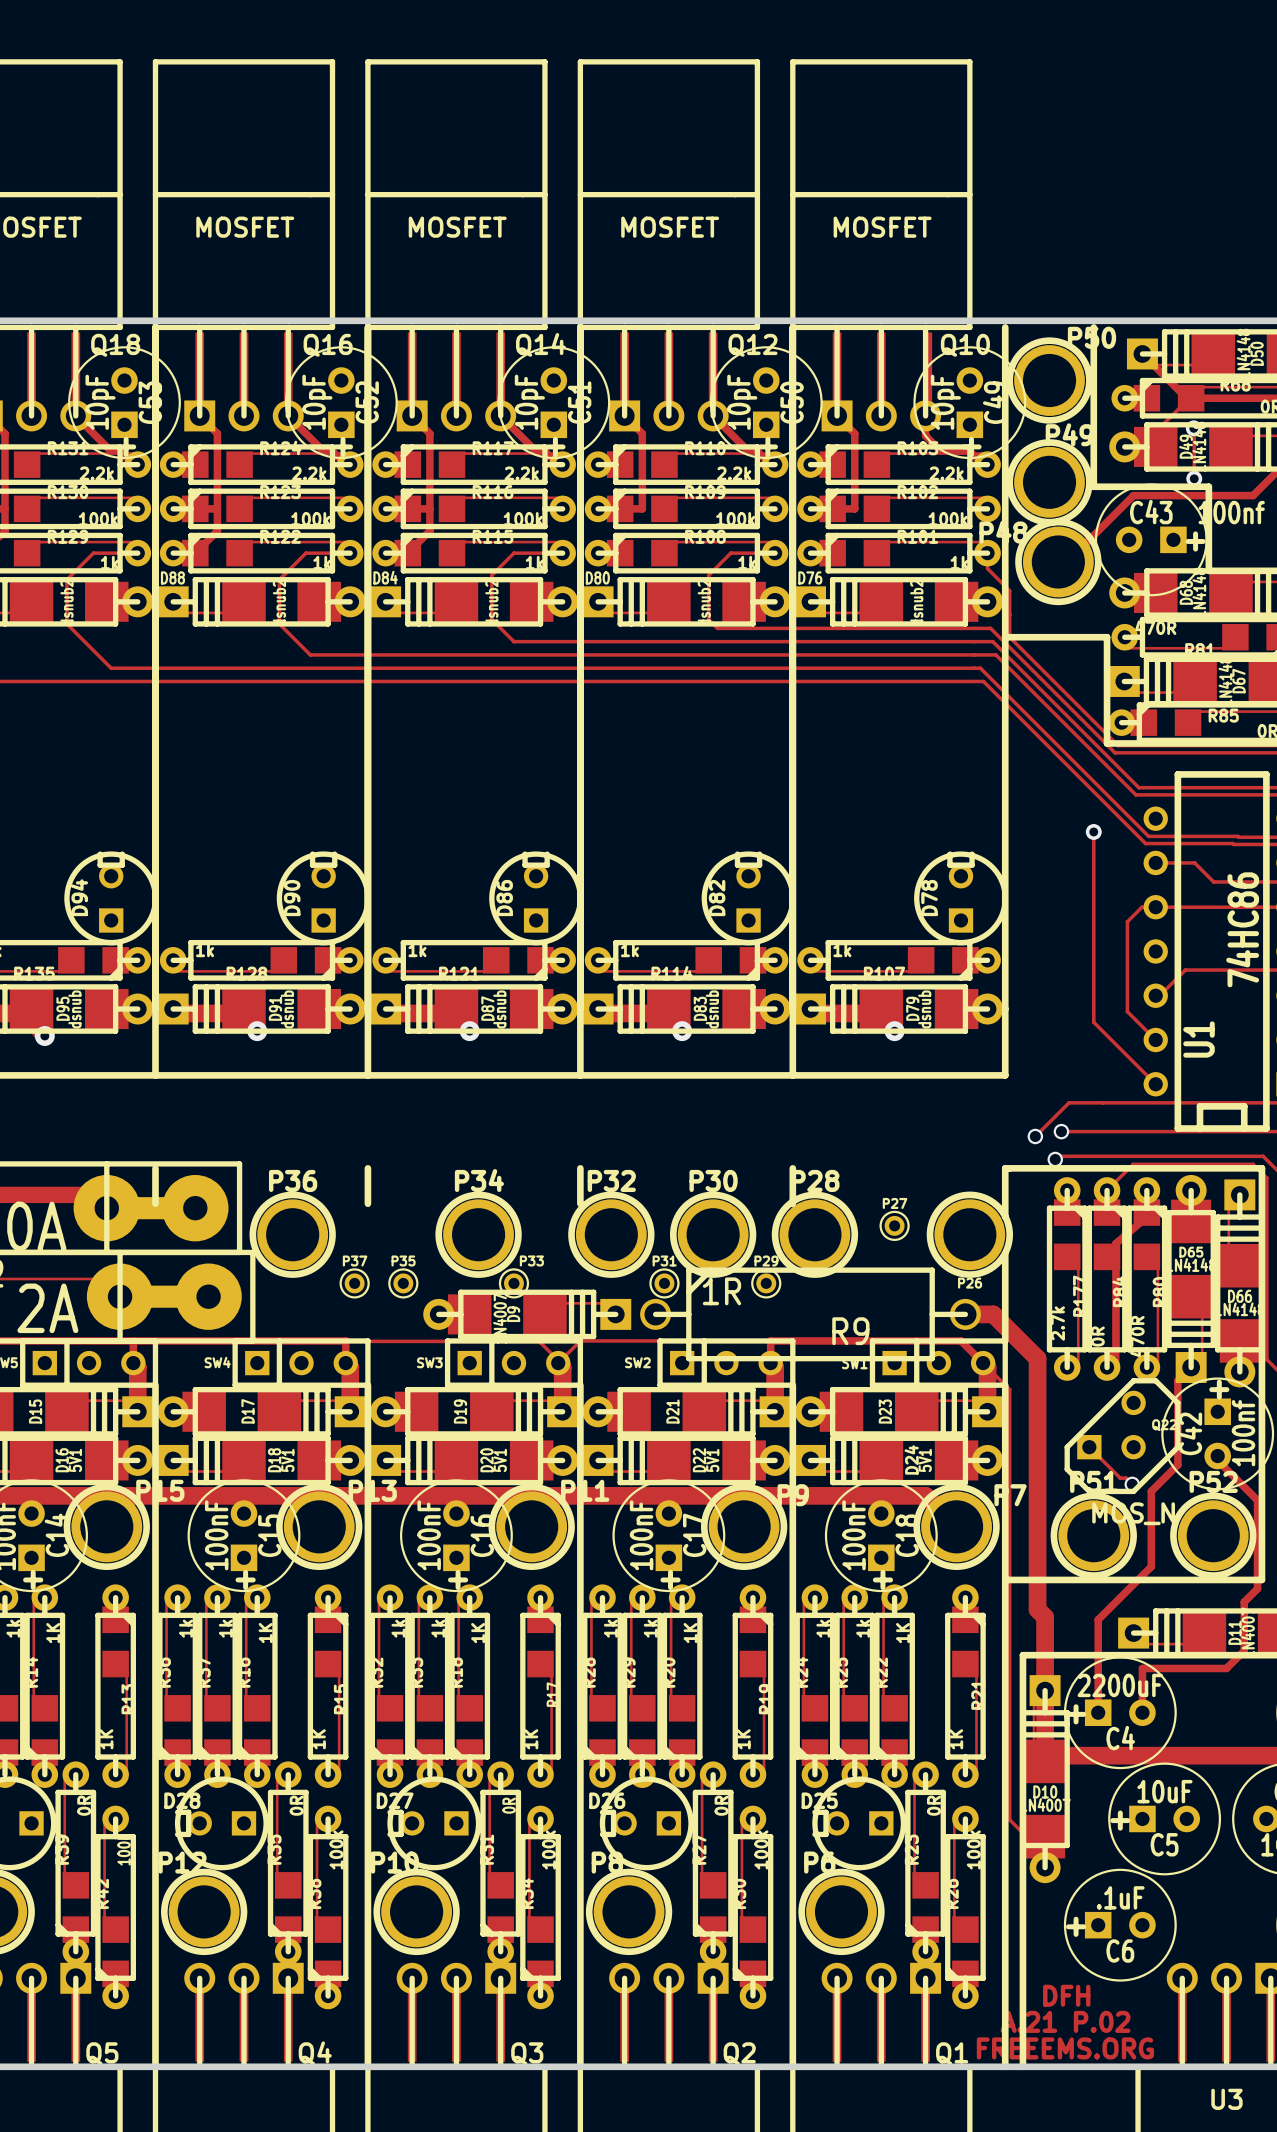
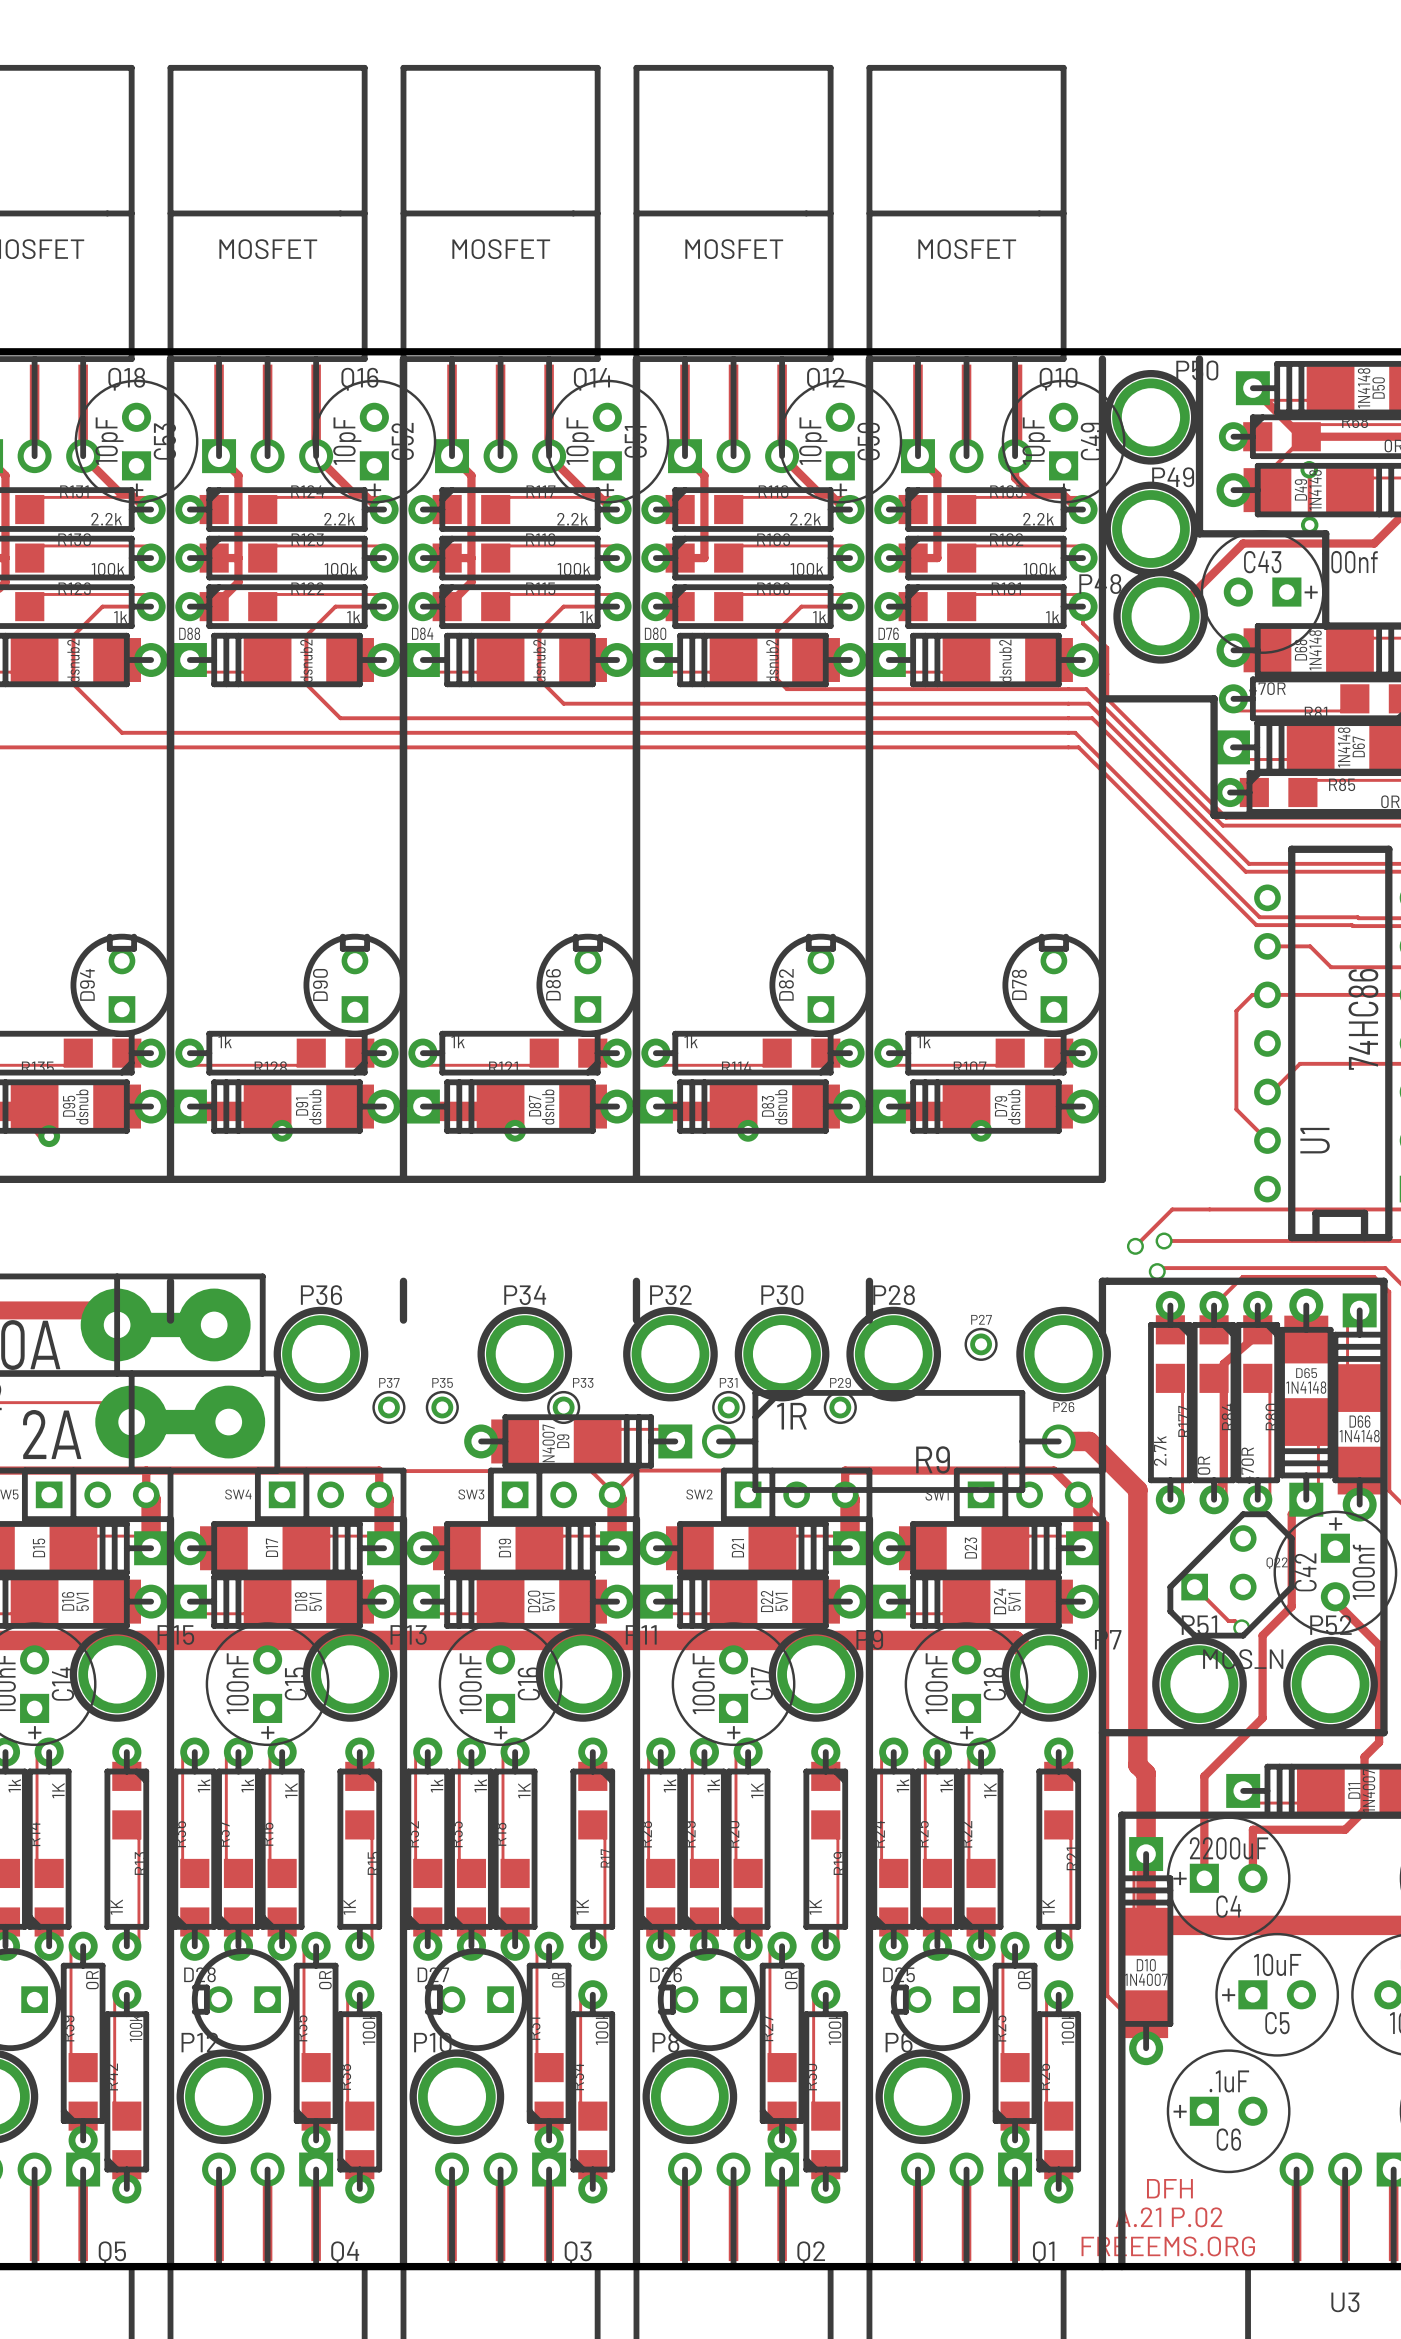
track: (1093, 831) (1093, 1022) (1155, 1084) -> none
via: (1093, 831) -> none

